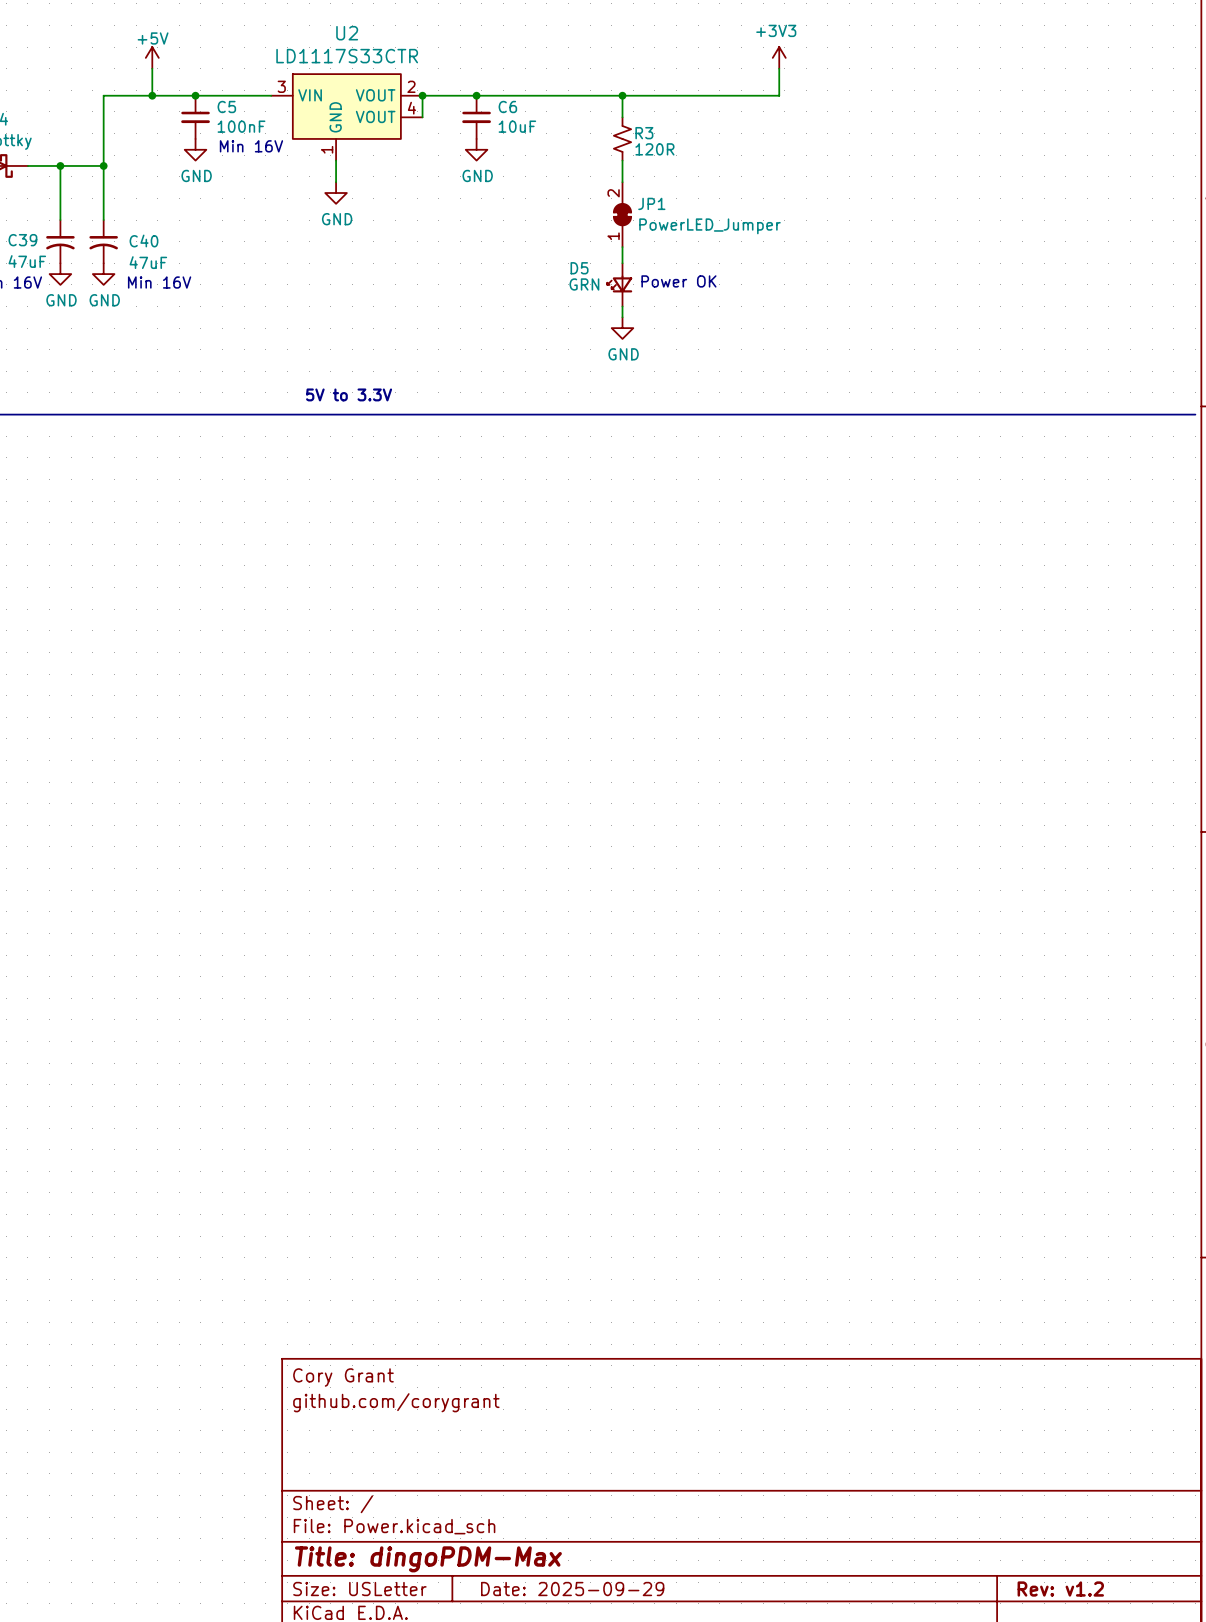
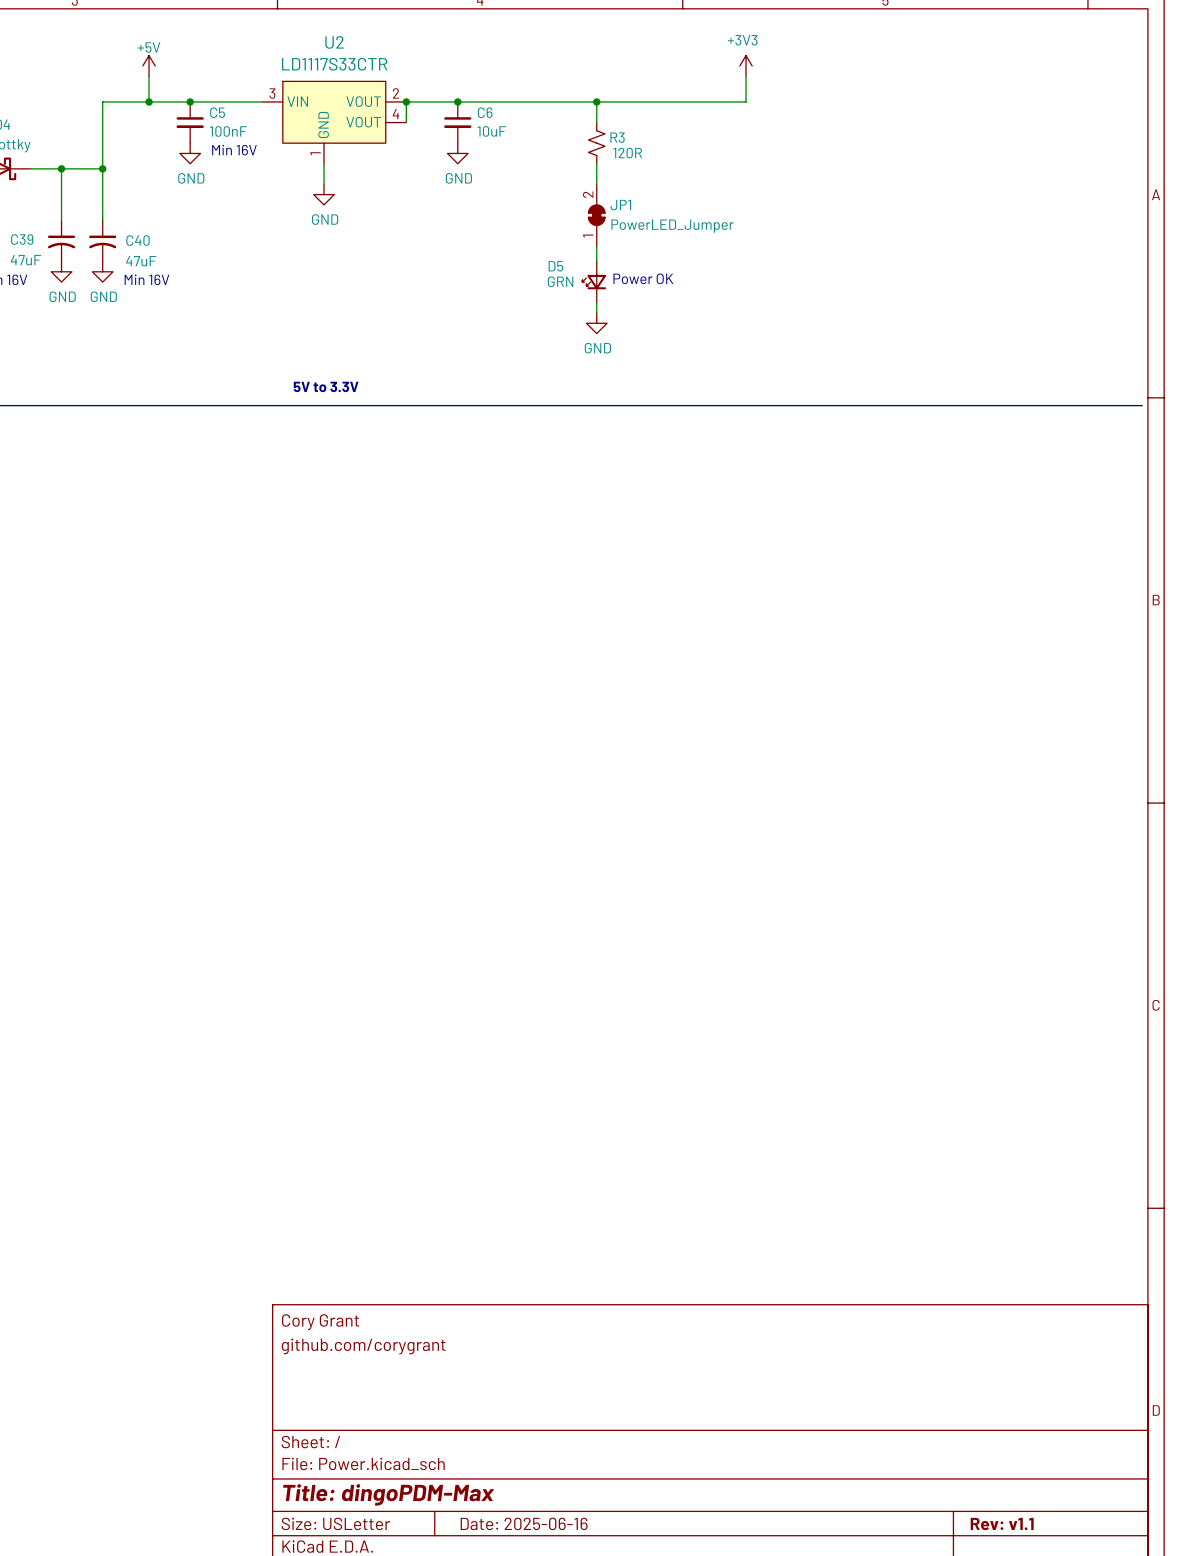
title block: Date: 2025-09-29 (572, 1589) -> Date: 2025-06-16 (524, 1523)
title block: Rev: v1.2 (1060, 1589) -> Rev: v1.1 (1002, 1523)

